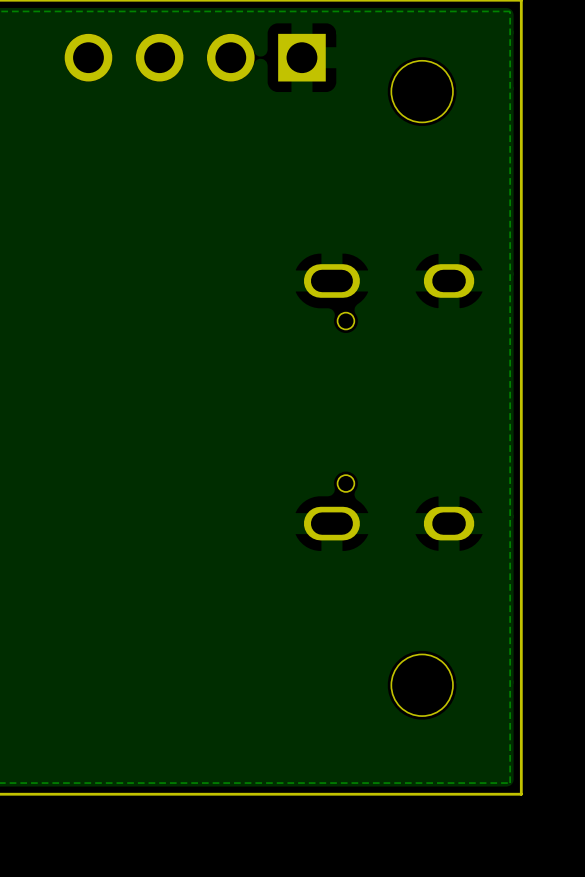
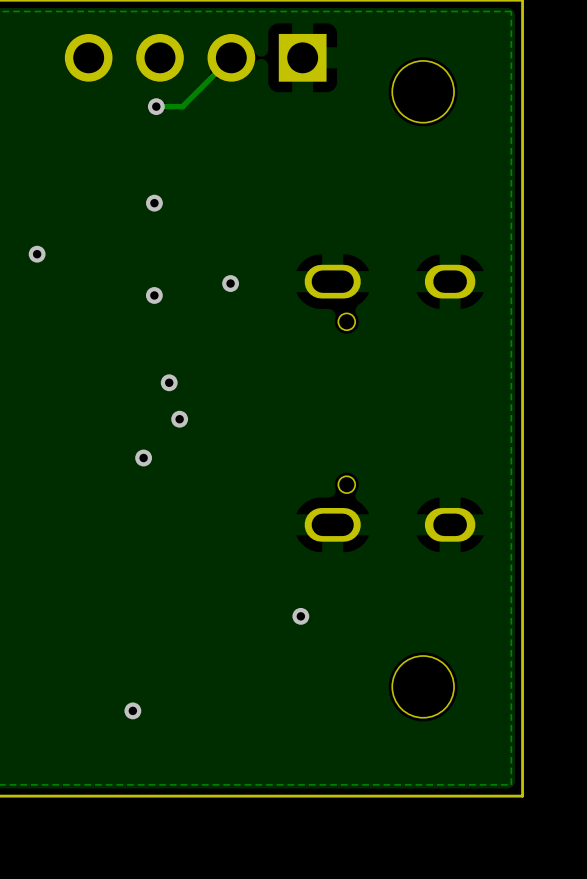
track: none -> (231, 57) (182, 106) (156, 106)
via: none -> (156, 106)
via: none -> (154, 203)
via: none -> (37, 254)
via: none -> (230, 283)
via: none -> (154, 295)
via: none -> (169, 382)
via: none -> (179, 419)
via: none -> (143, 458)
via: none -> (300, 616)
via: none -> (132, 710)

